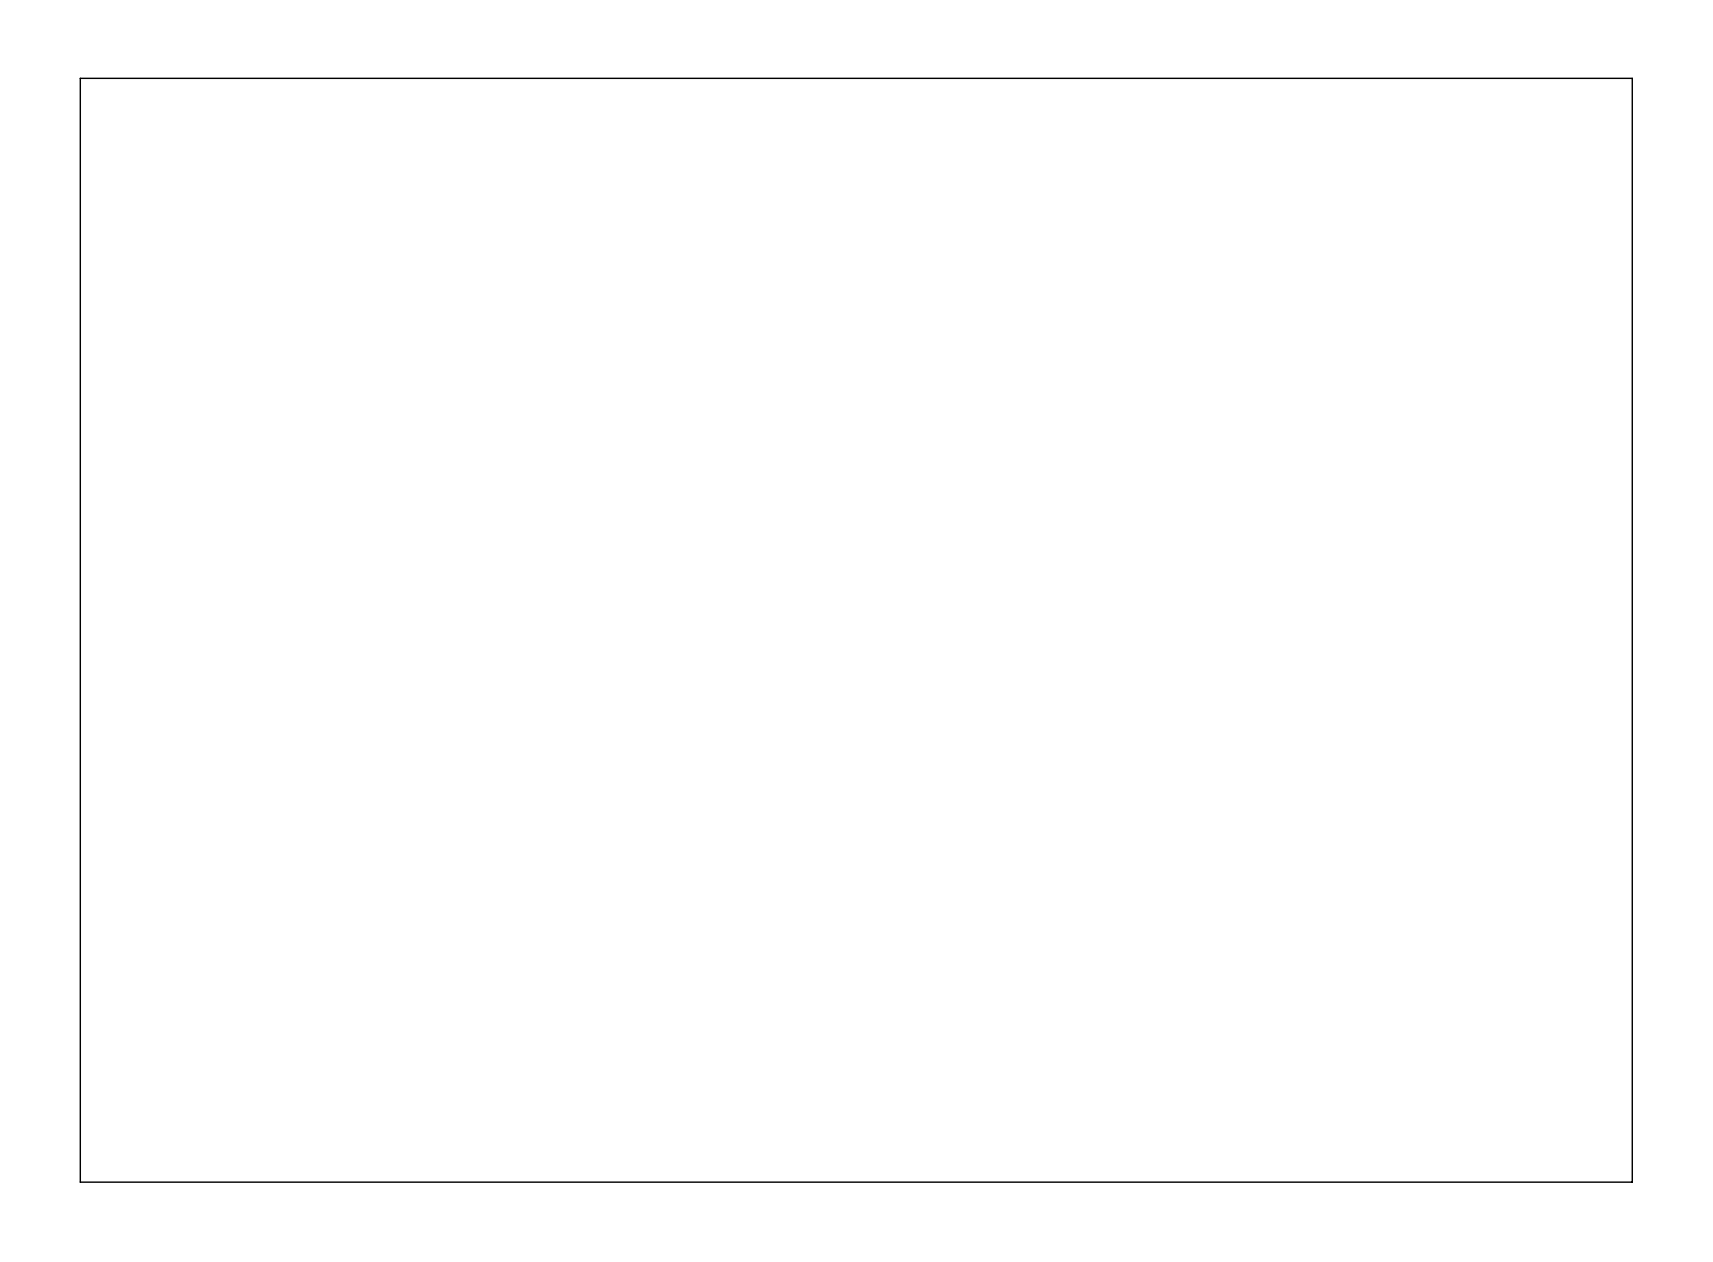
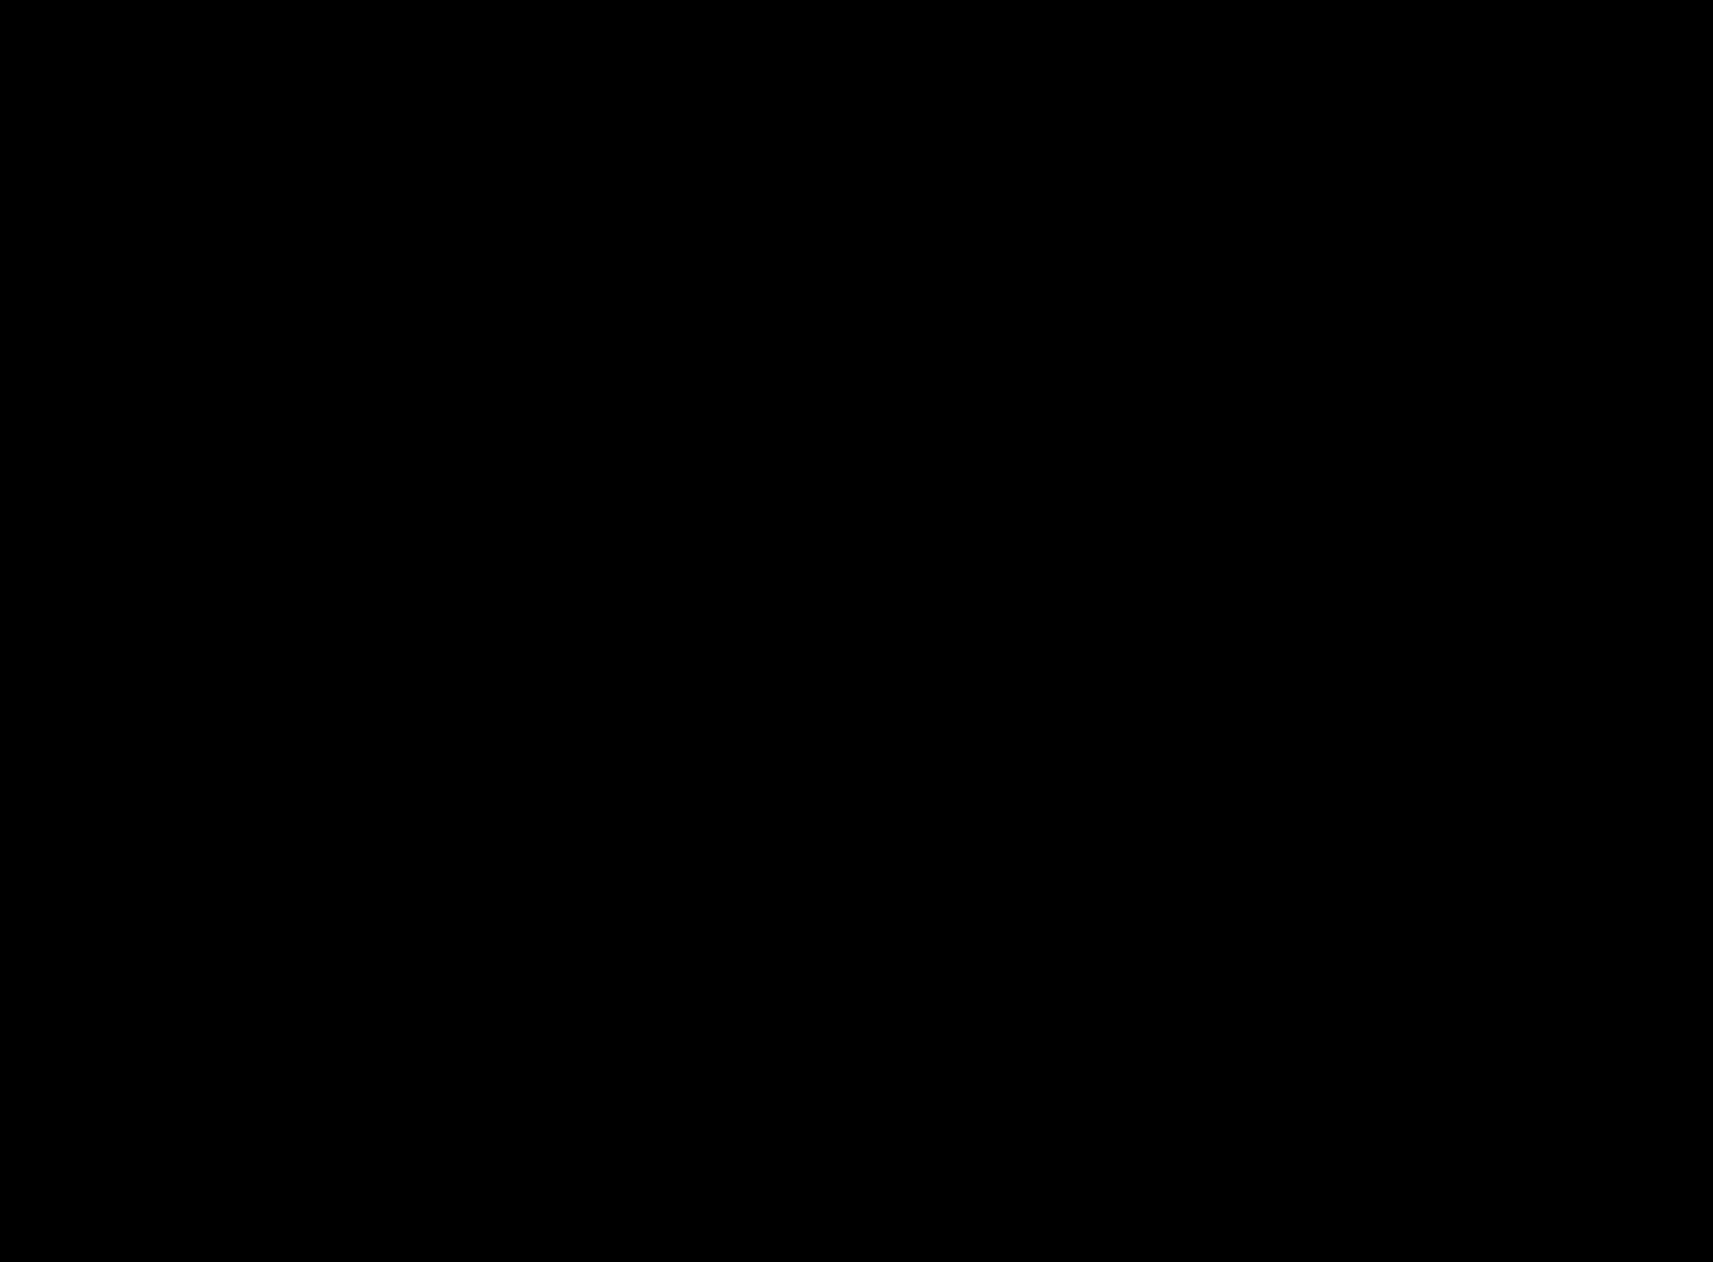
board edge: (80, 78) (1632, 78) (1632, 1182) (80, 1182) (80, 78) -> none

